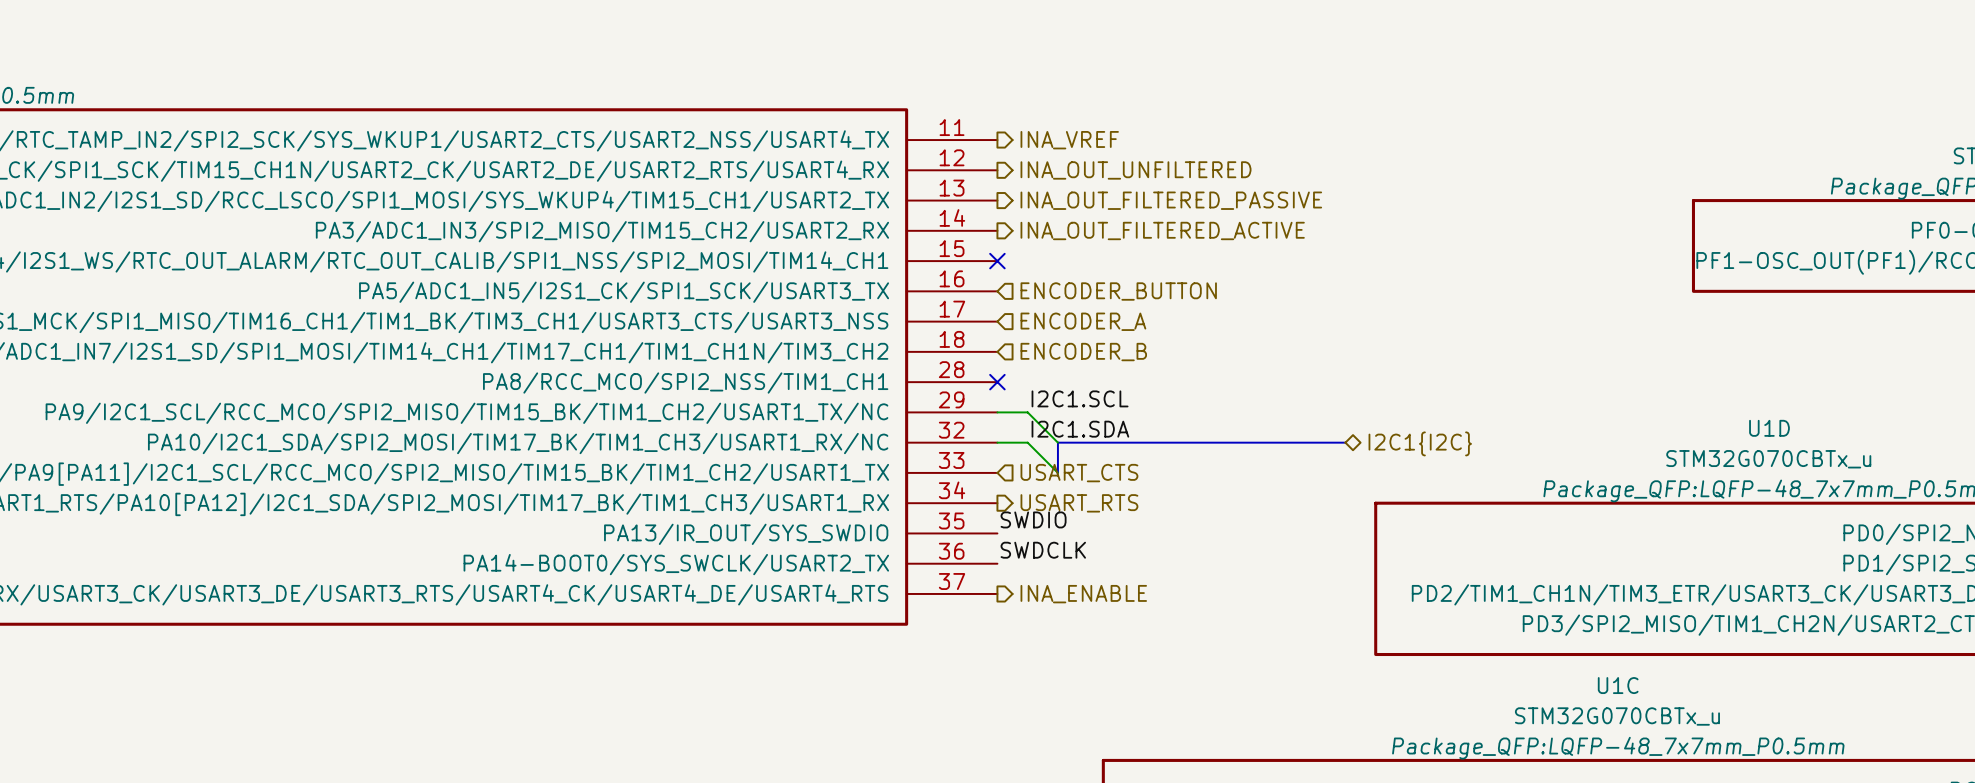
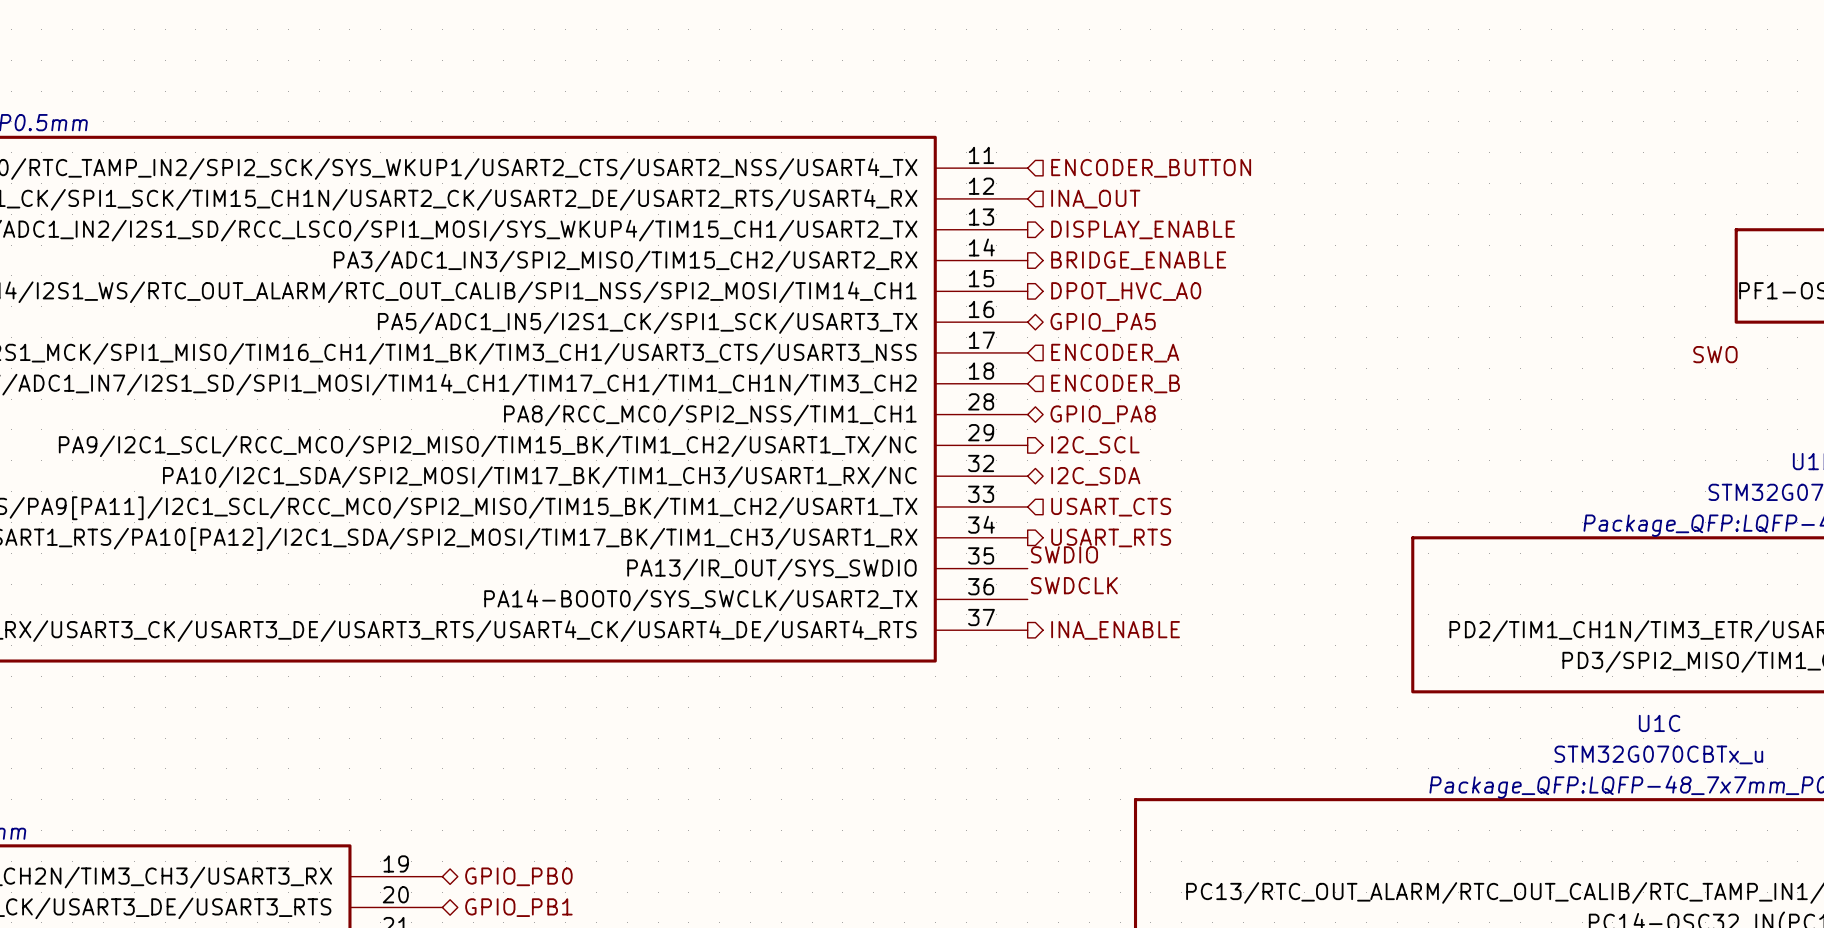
hierarchical label shape: output (1069, 140) -> input (1151, 168)
hierarchical label: INA_VREF (1069, 140) -> ENCODER_BUTTON (1151, 168)
hierarchical label shape: output (1136, 170) -> input (1095, 199)
hierarchical label: INA_OUT_UNFILTERED (1136, 170) -> INA_OUT (1095, 199)
hierarchical label: INA_OUT_FILTERED_PASSIVE (1171, 200) -> DISPLAY_ENABLE (1143, 229)
hierarchical label: INA_OUT_FILTERED_ACTIVE (1162, 230) -> BRIDGE_ENABLE (1138, 260)
no-connect mark: (997, 261) -> none
hierarchical label: none -> DPOT_HVC_A0 (1126, 291)
hierarchical label shape: input (1118, 291) -> bidirectional (1103, 322)
hierarchical label: ENCODER_BUTTON (1118, 291) -> GPIO_PA5 (1103, 322)
label: none -> SWO (1715, 354)
no-connect mark: (997, 382) -> none
hierarchical label: none -> GPIO_PA8 (1103, 414)
label: I2C1.SCL (1080, 398) -> none
wire: (997, 412) (1027, 412) (1057, 442) -> none
hierarchical label: none -> I2C_SCL (1095, 445)
label: I2C1.SDA (1080, 429) -> none
wire: (997, 442) (1027, 442) (1057, 472) -> none
hierarchical label: none -> I2C_SDA (1095, 476)
bus: (1345, 442) (1057, 442) (1057, 472) -> none
hierarchical label: I2C1{I2C} (1420, 443) -> none

